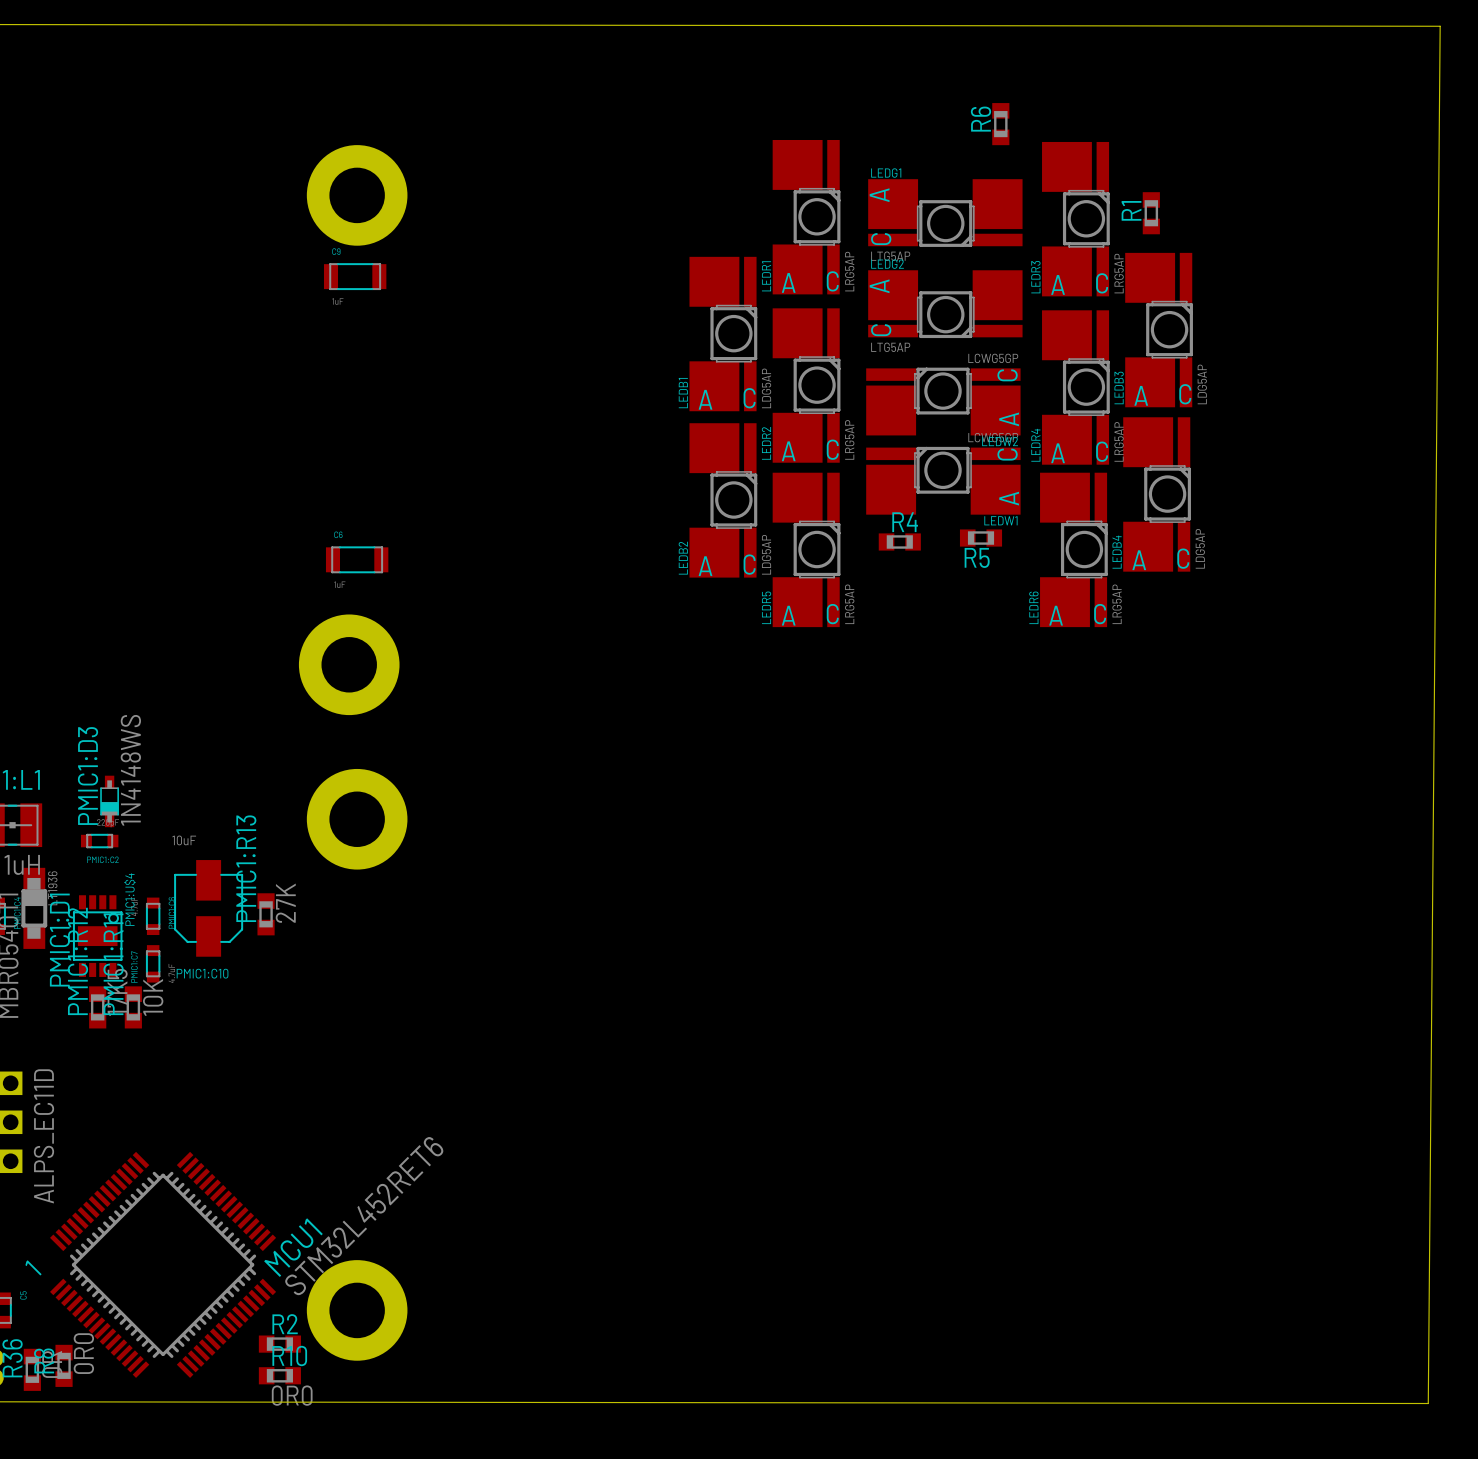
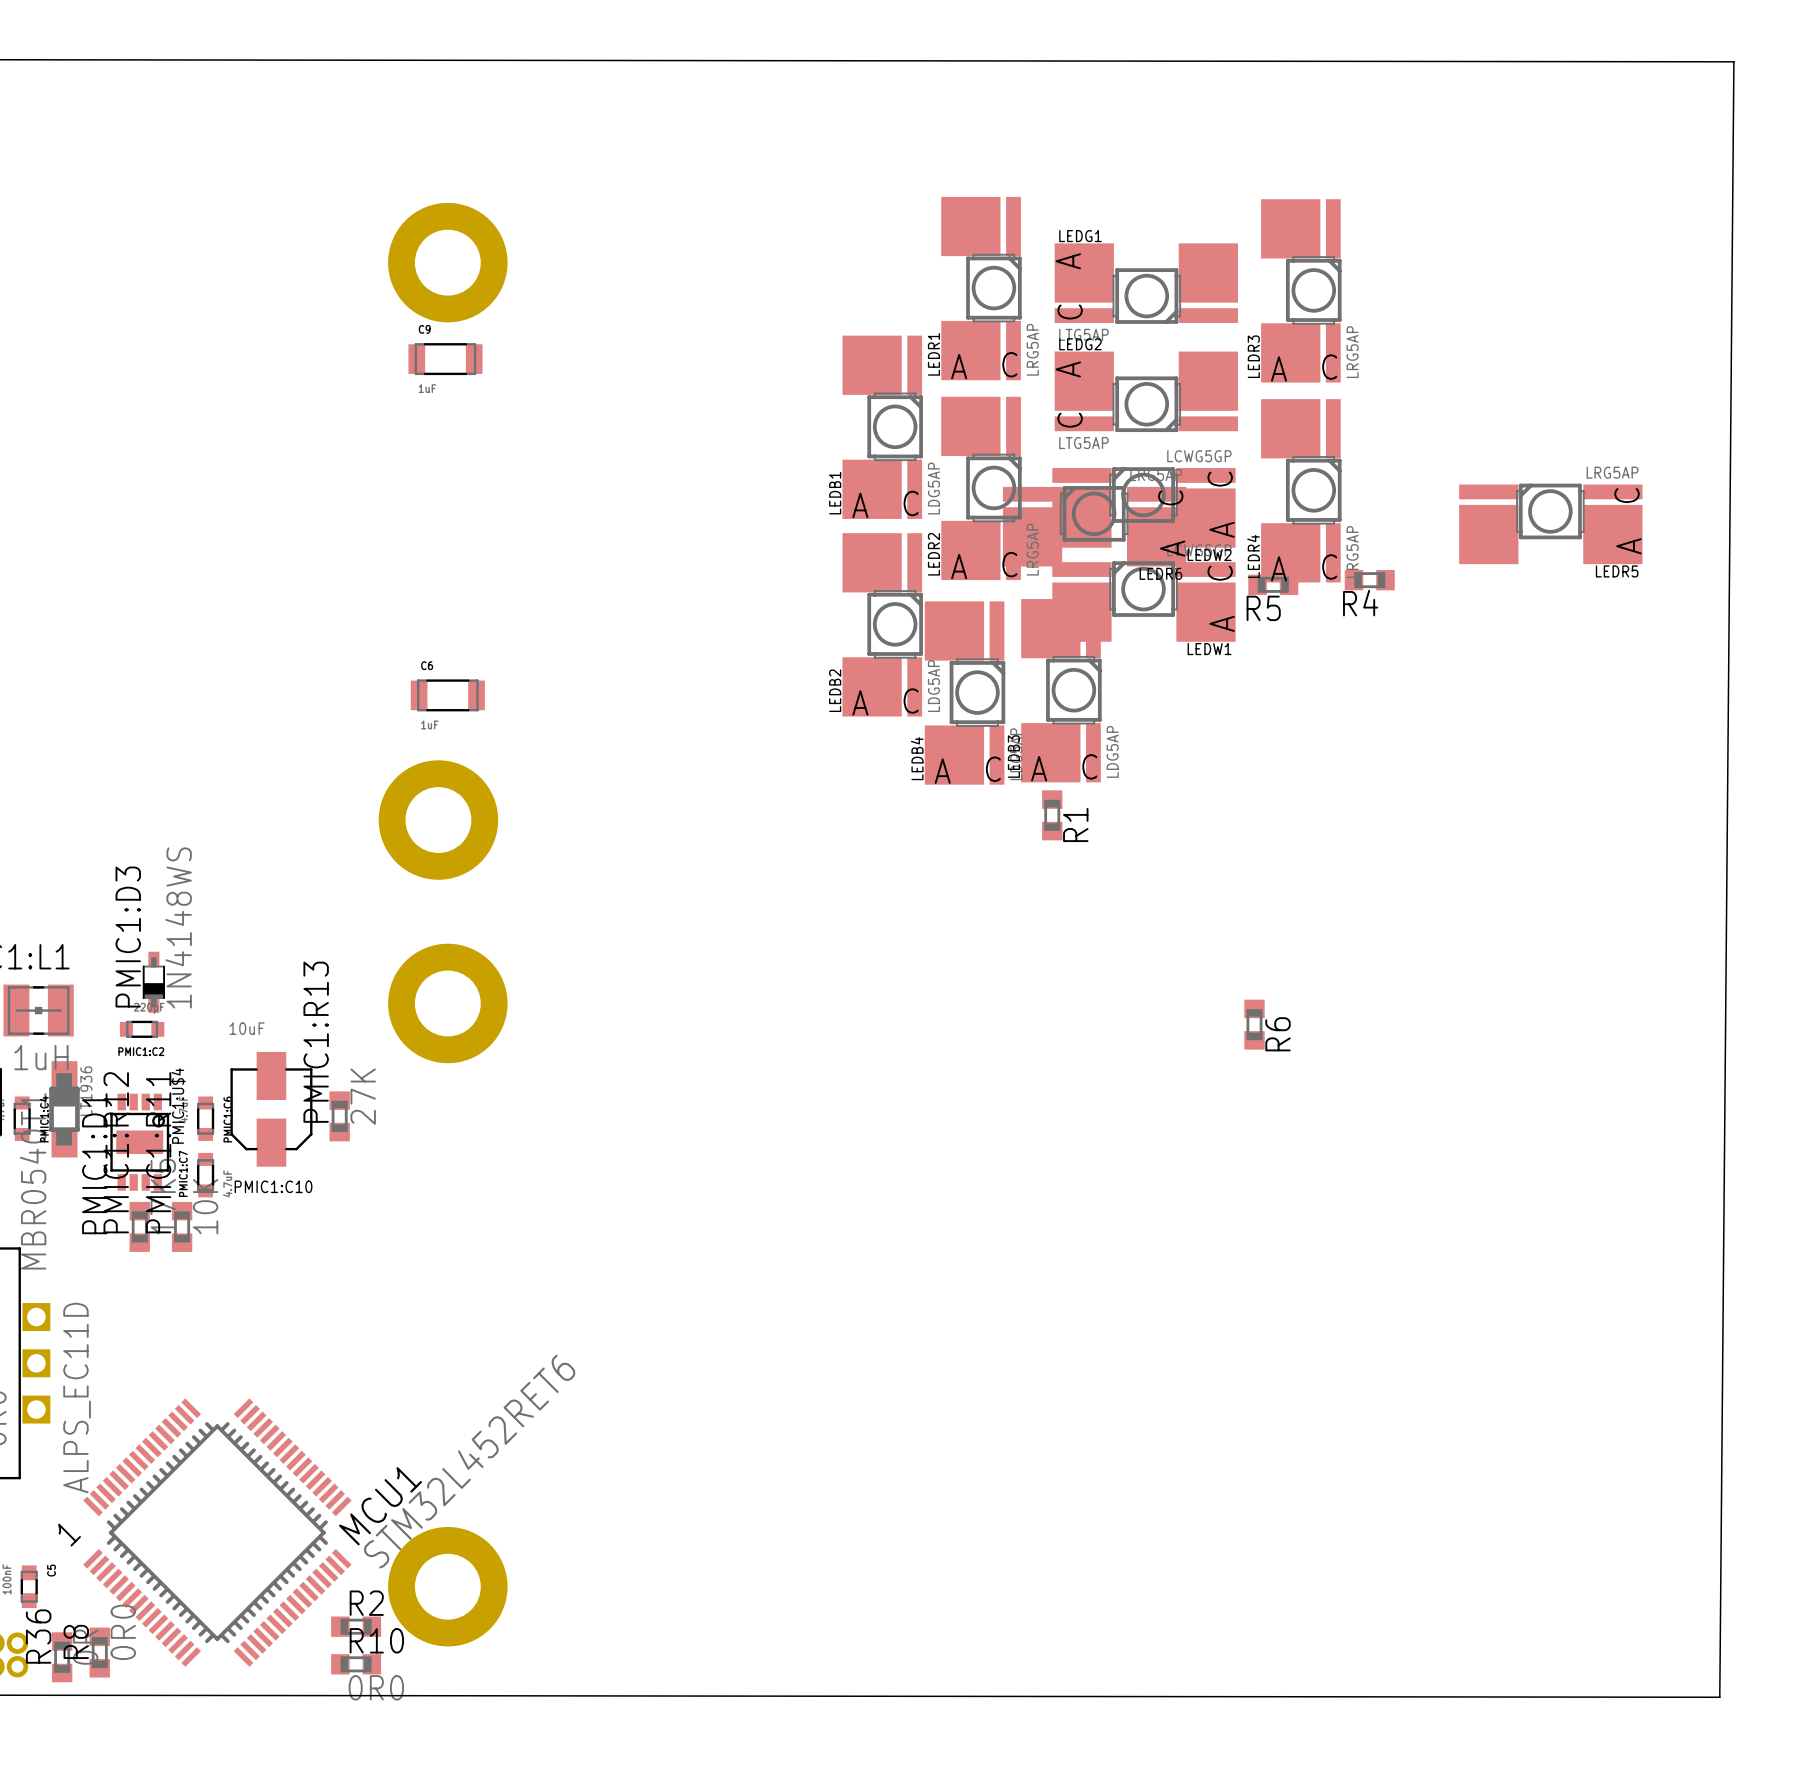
R6 name position: R6 (980, 119) -> R6 (1278, 1034)
R6 position: (1000, 124) -> (1254, 1024)
R1 name position: R1 (1131, 210) -> R1 (1075, 824)
R1 position: (1151, 213) -> (1052, 815)
LEDB3 position: (1159, 330) -> (1061, 690)
LEDB4 position: (1157, 494) -> (965, 693)
R4 name position: R4 (905, 522) -> R4 (1360, 603)
R5 position: (981, 538) -> (1273, 584)
R4 position: (899, 541) -> (1369, 580)
LEDR5 rotation: 0° (806, 549) -> 90° counterclockwise (1550, 523)
LEDR5 position: (806, 549) -> (1550, 523)
LEDR6 rotation: 0° (1073, 549) -> 90° counterclockwise (1094, 526)
LEDR6 position: (1073, 549) -> (1094, 526)

